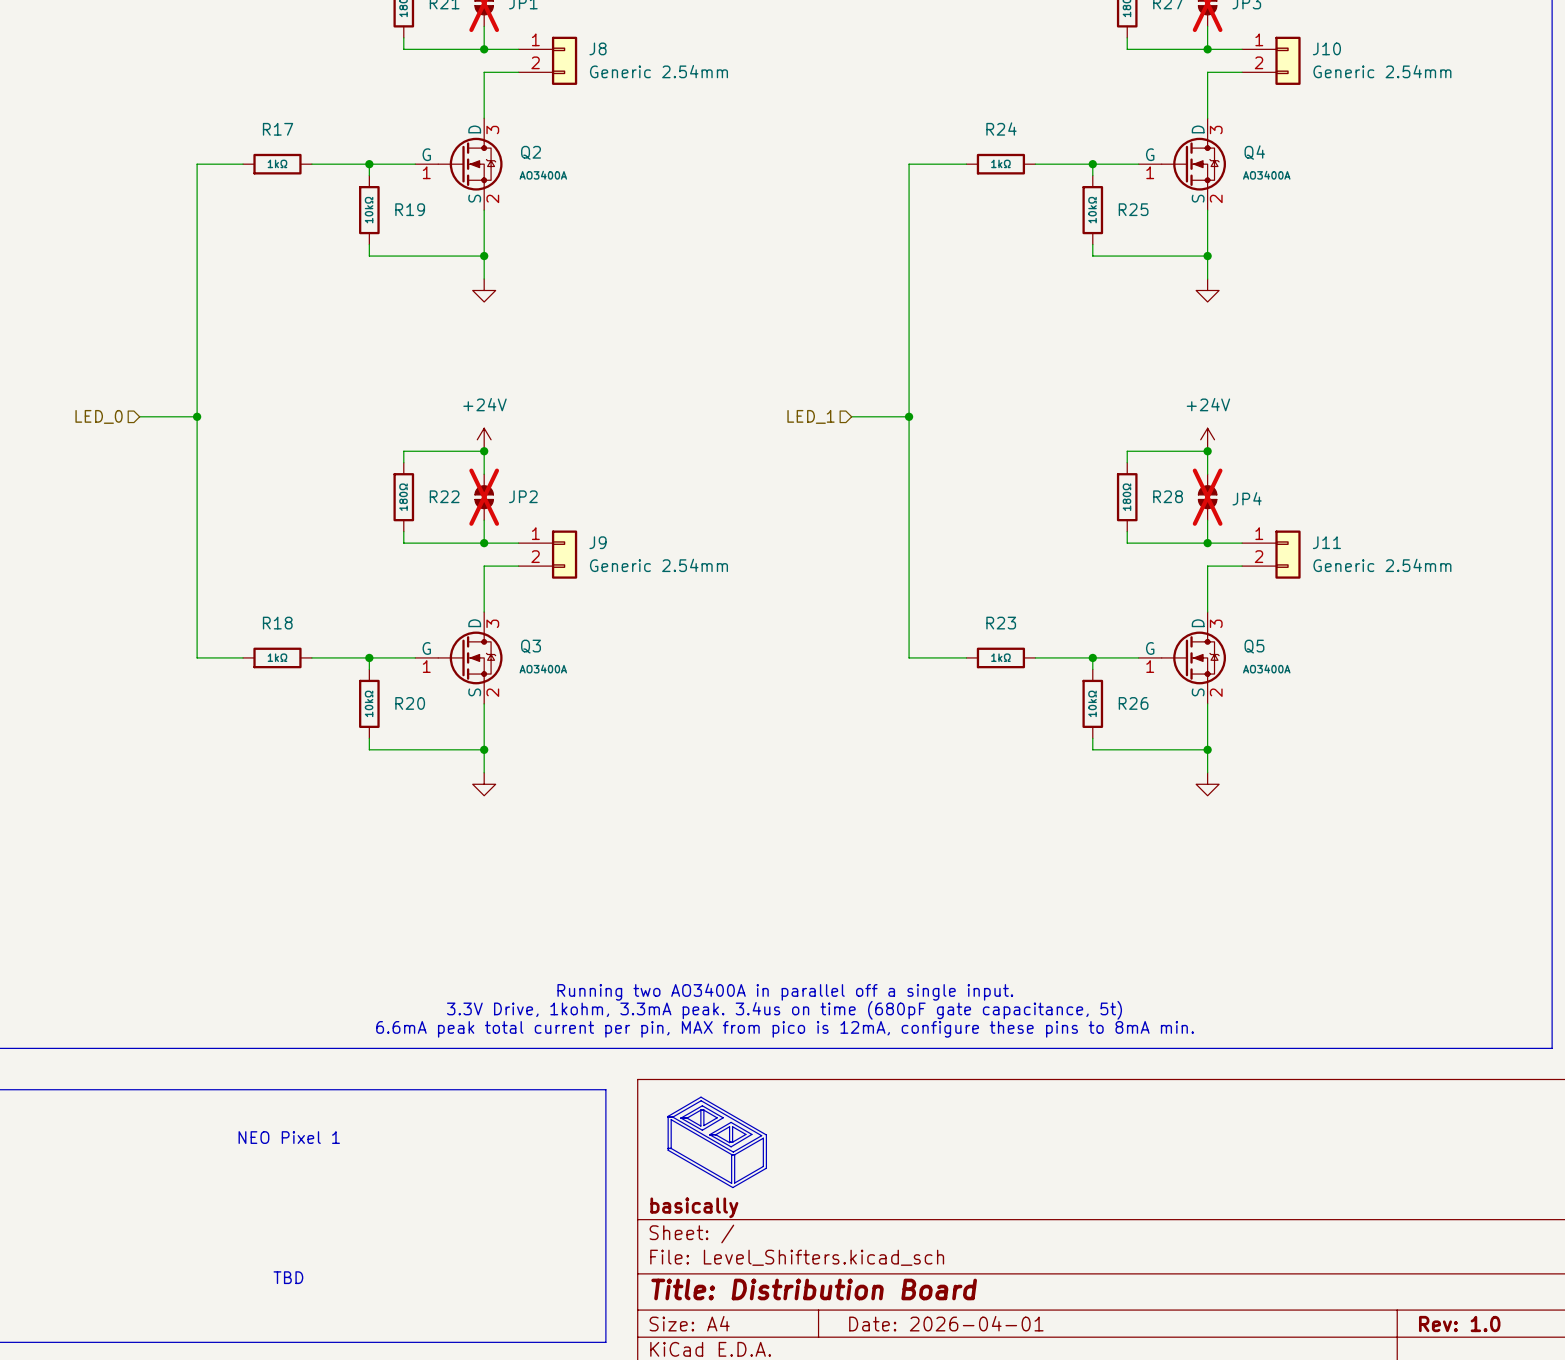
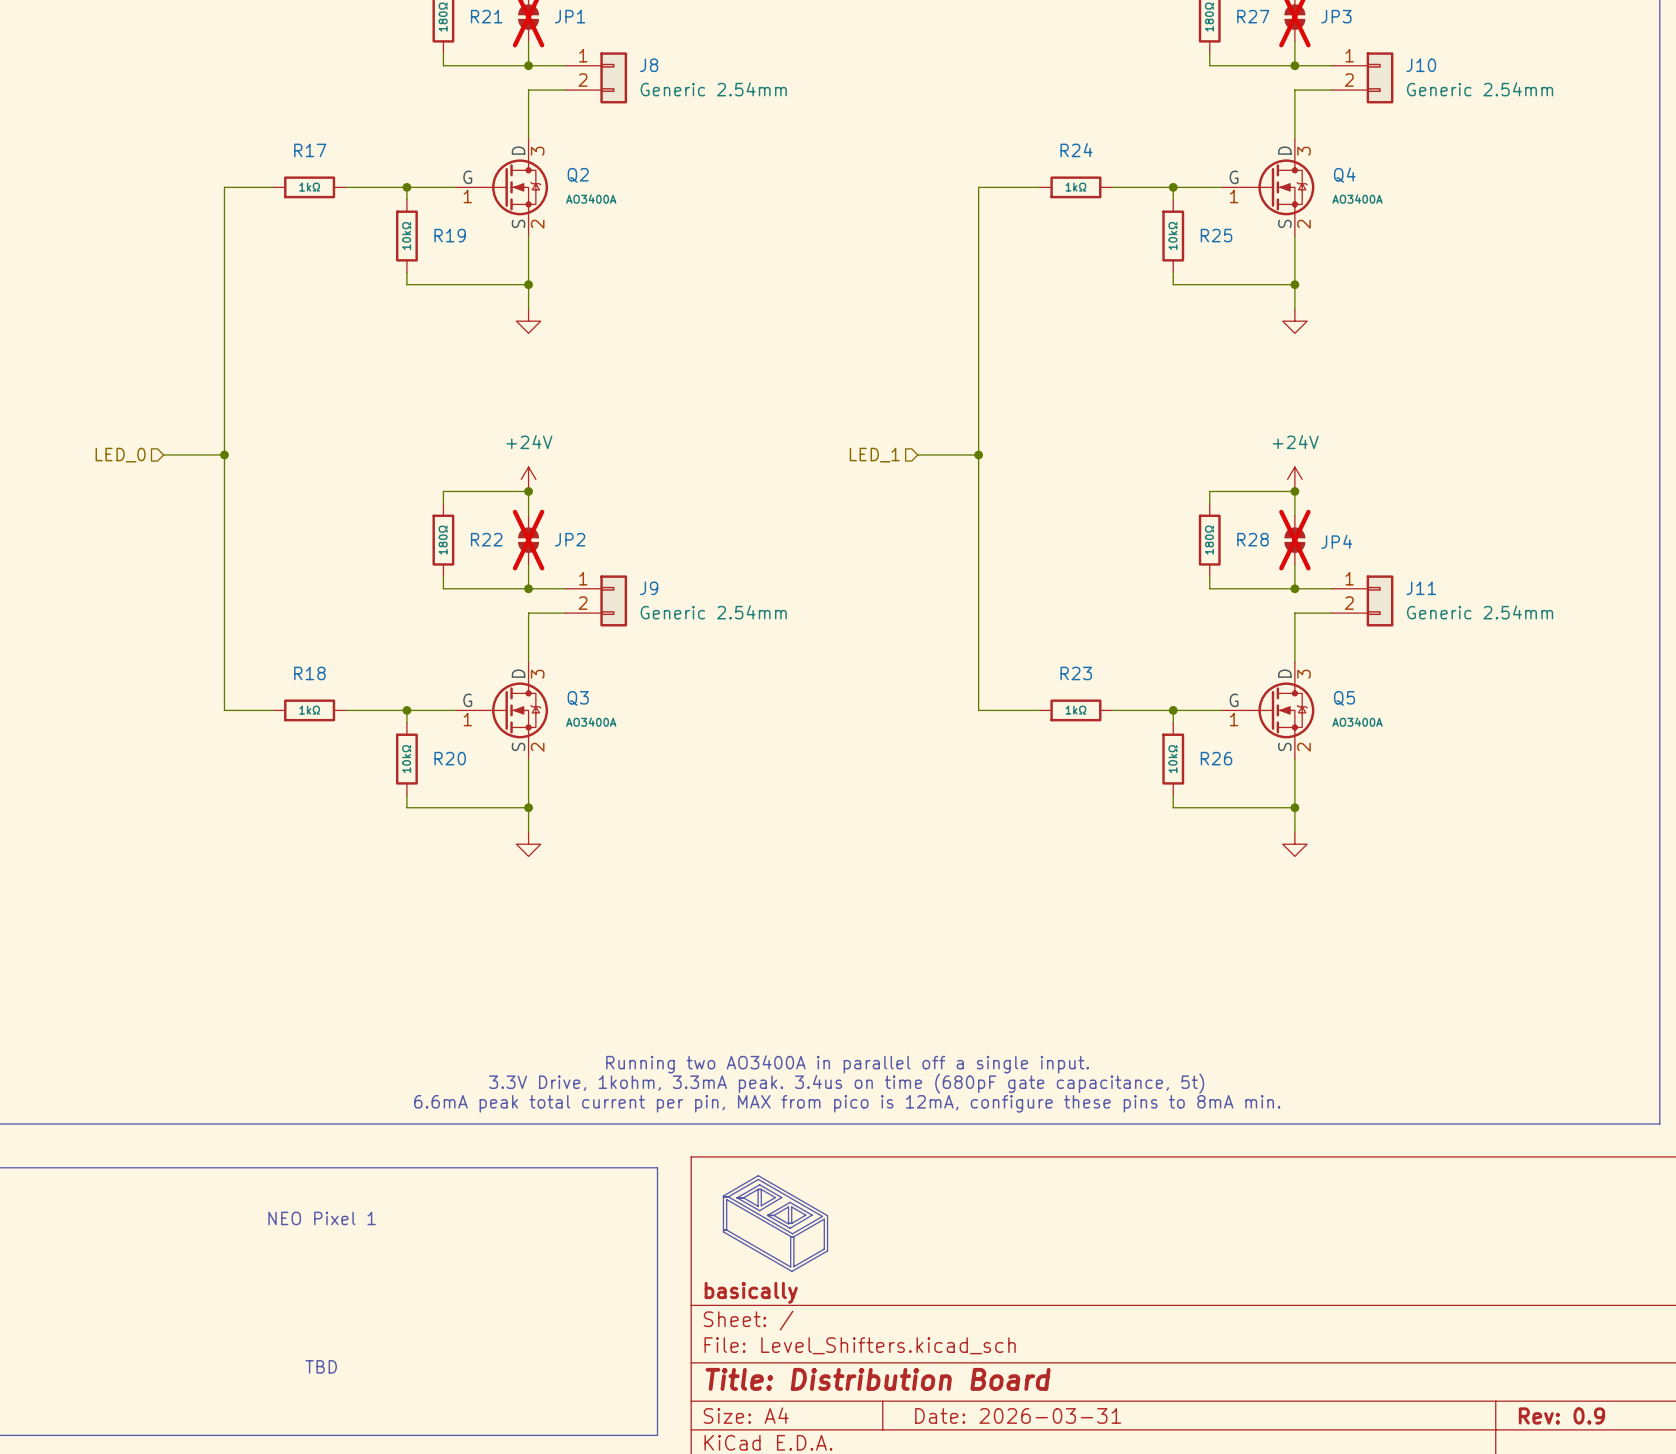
title block: Date: 2026-04-01 (946, 1323) -> Date: 2026-03-31 (1018, 1415)
title block: Rev: 1.0 (1459, 1324) -> Rev: 0.9 (1561, 1415)

